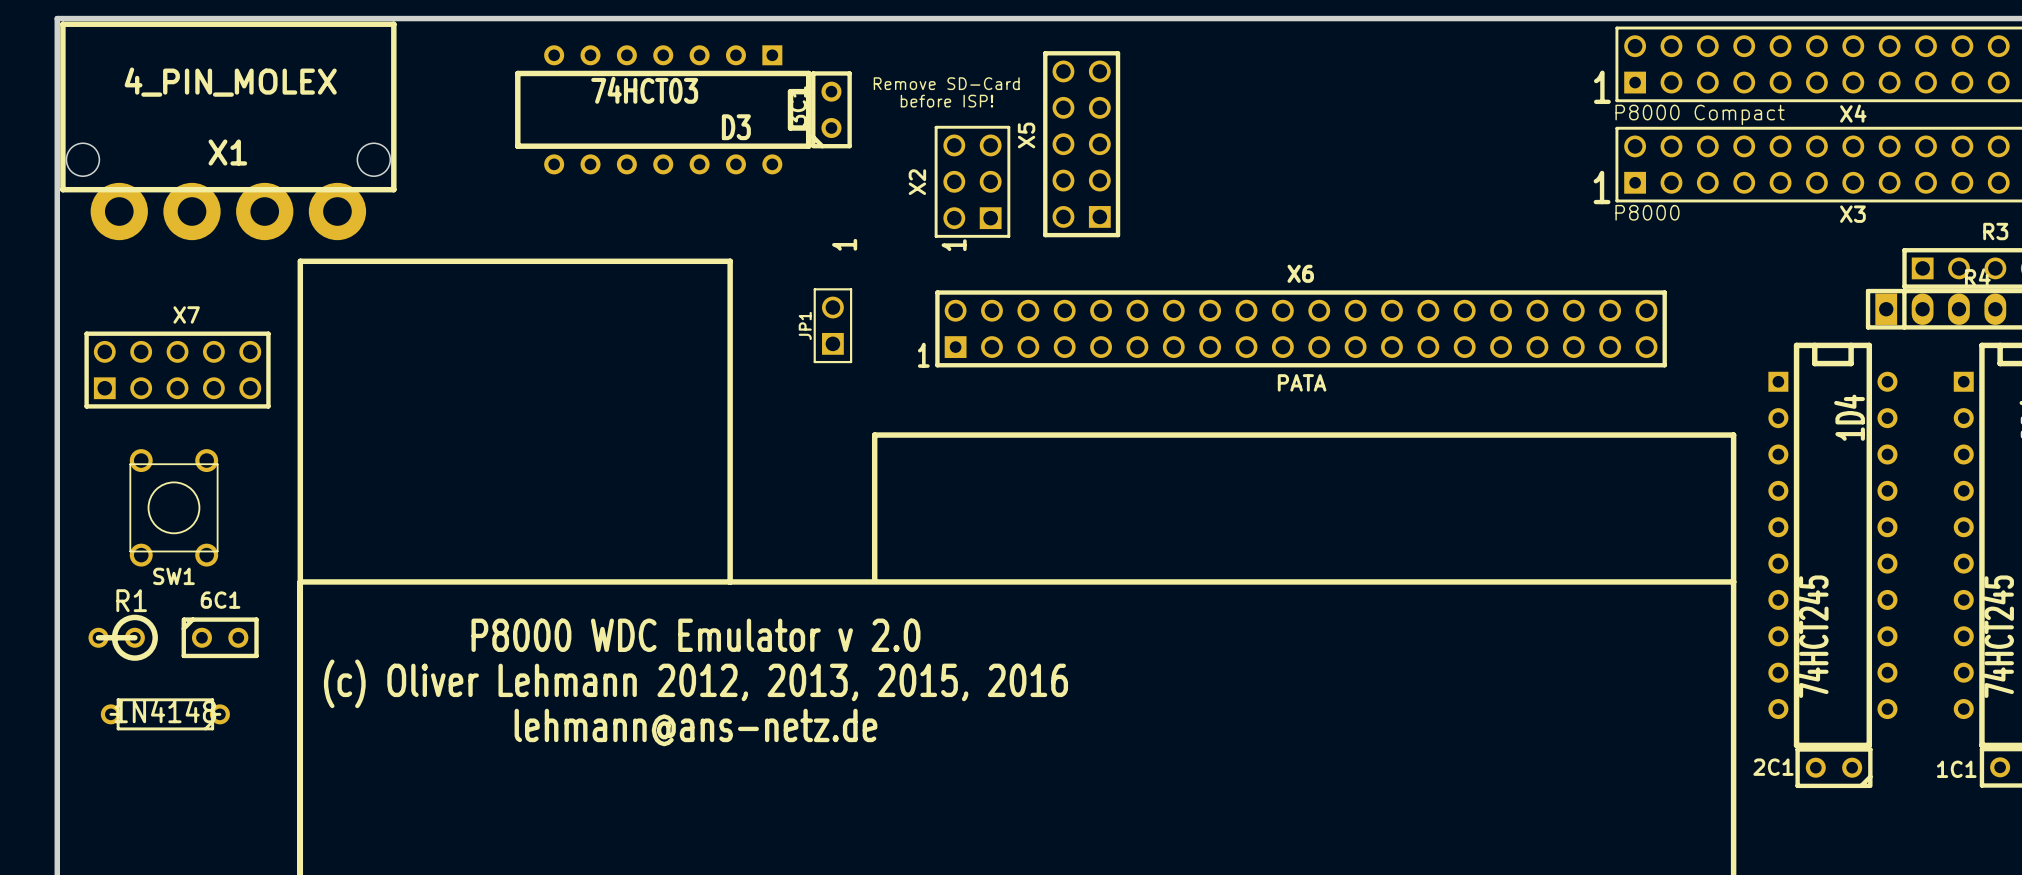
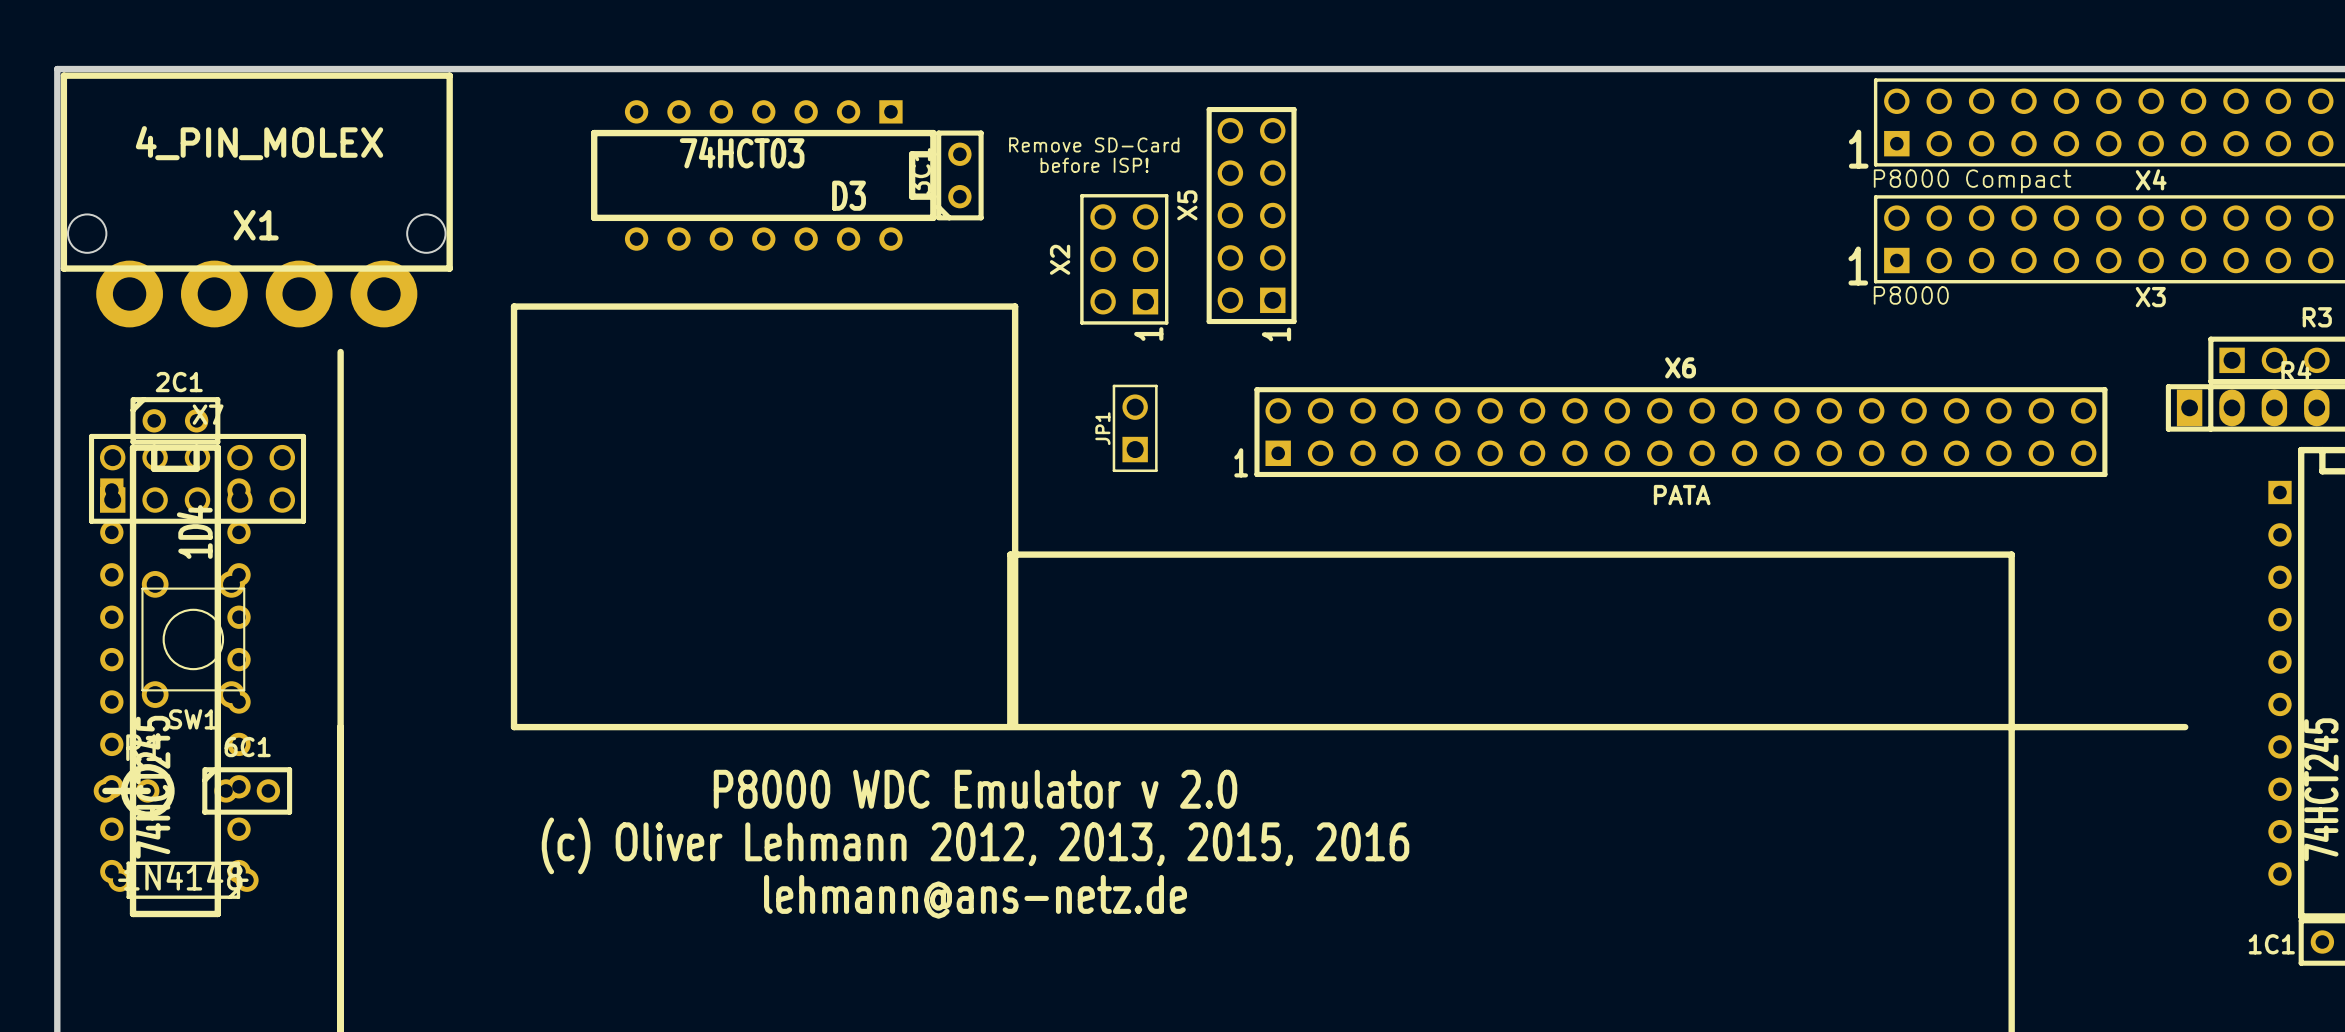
text: 1 (844, 244) -> none
text position: 1 (954, 245) -> 1 (1148, 334)
text: none -> 1 (1276, 334)
line: (300, 261) (730, 261) -> none
line: (730, 261) (730, 581) -> none
JP1 position: (832, 325) -> (1135, 428)
X6 position: (1301, 328) -> (1680, 432)
text: 1 (923, 355) -> none
text: none -> 1 (1241, 462)
1D4 position: (1832, 545) -> (175, 680)
line: (300, 581) (1733, 581) -> none
line: none -> (1015, 726) (1015, 306) (514, 306) (514, 727) (2185, 727)
text position: P8000 WDC Emulator v 2.0 (695, 635) -> P8000 WDC Emulator v 2.0 (975, 789)
text position: (c) Oliver Lehmann 2012, 2013, 2015, 2016 (695, 683) -> (c) Oliver Lehmann 2012, 2013, 2015, 2016 (975, 845)
text position: lehmann@ans-netz.de (695, 727) -> lehmann@ans-netz.de (975, 896)
2C1 name position: 2C1 (1773, 767) -> 2C1 (179, 382)
2C1 rotation: 0° (1833, 767) -> 180° (175, 420)
2C1 position: (1833, 767) -> (175, 420)

